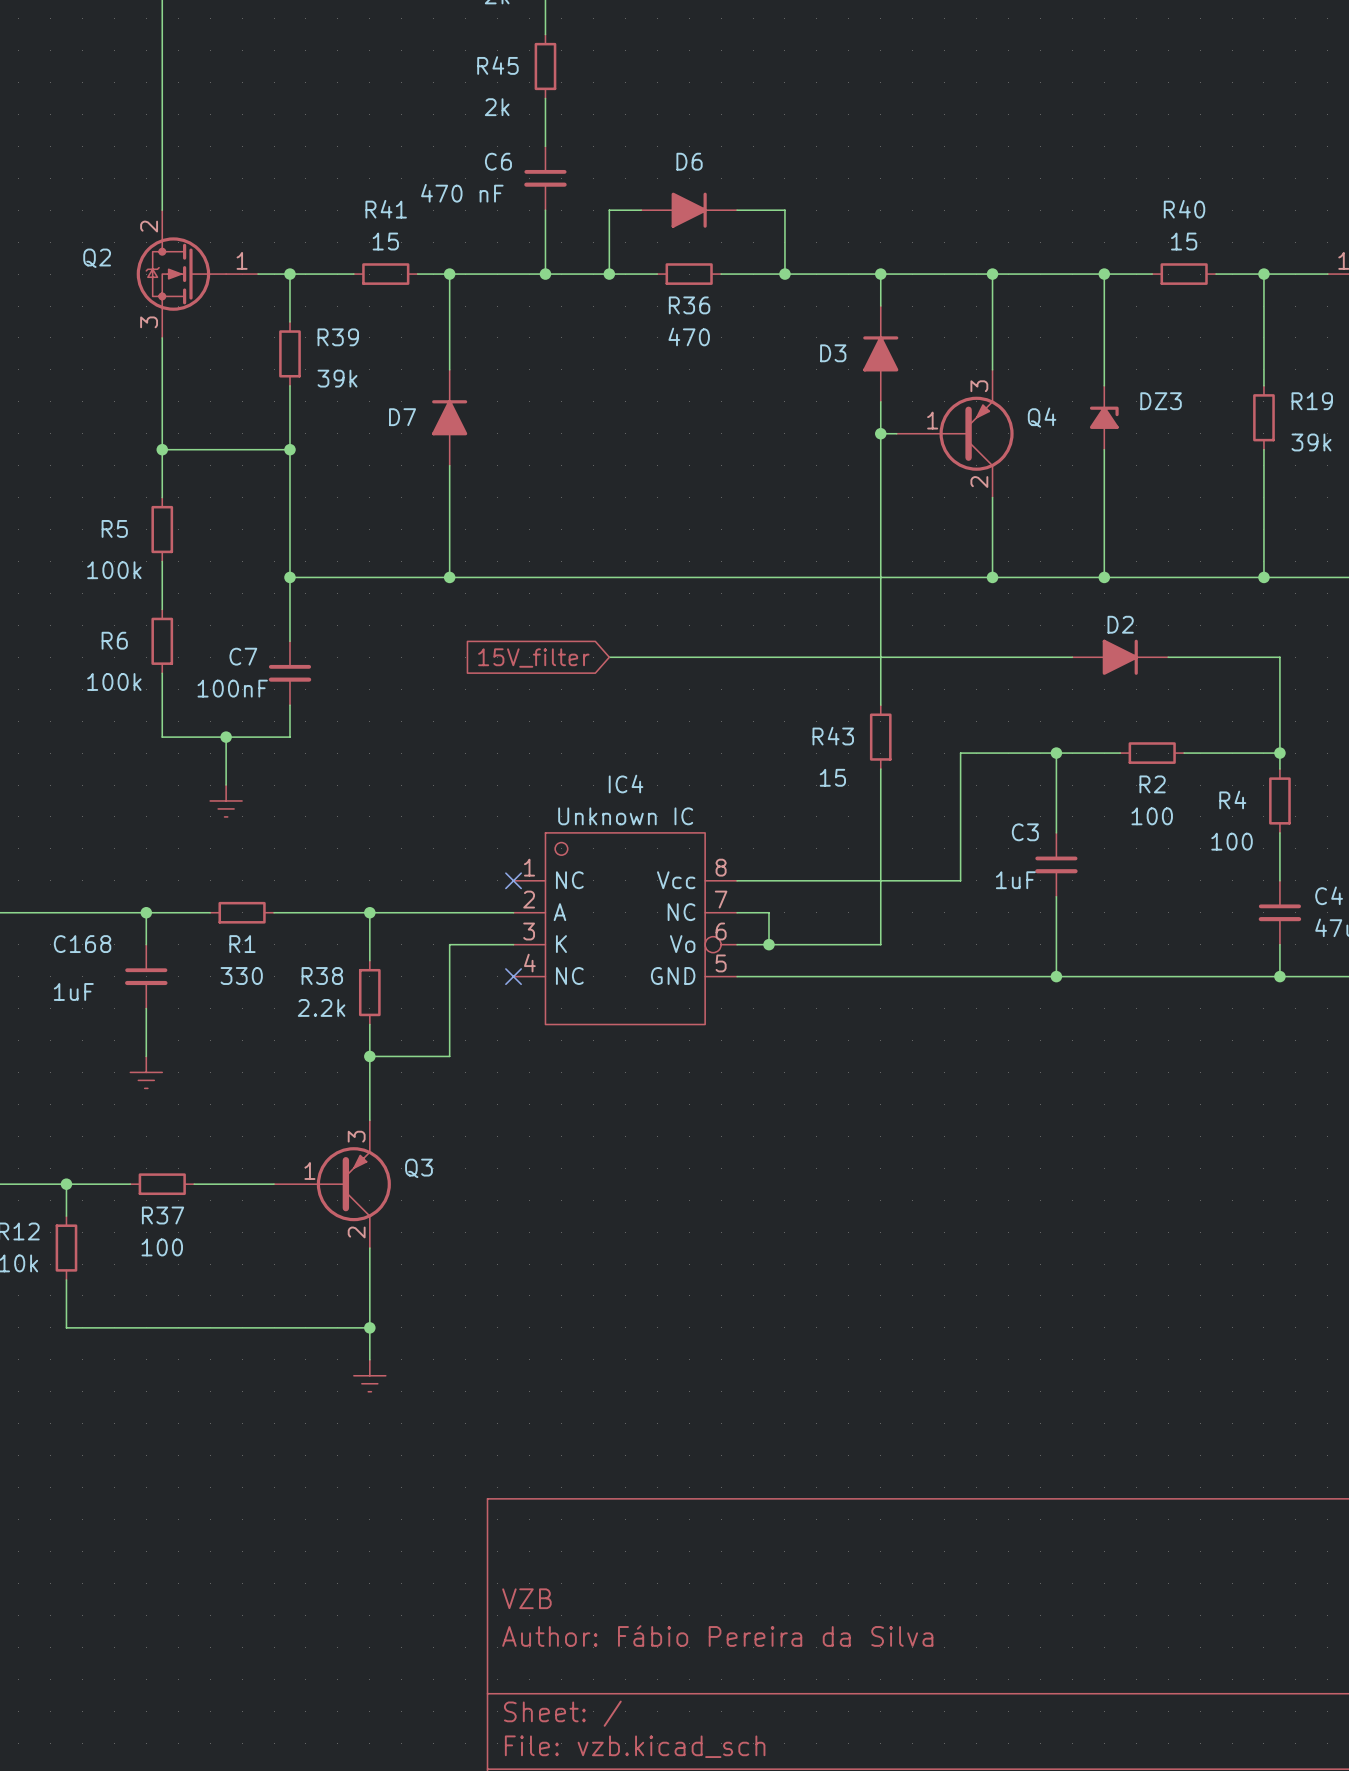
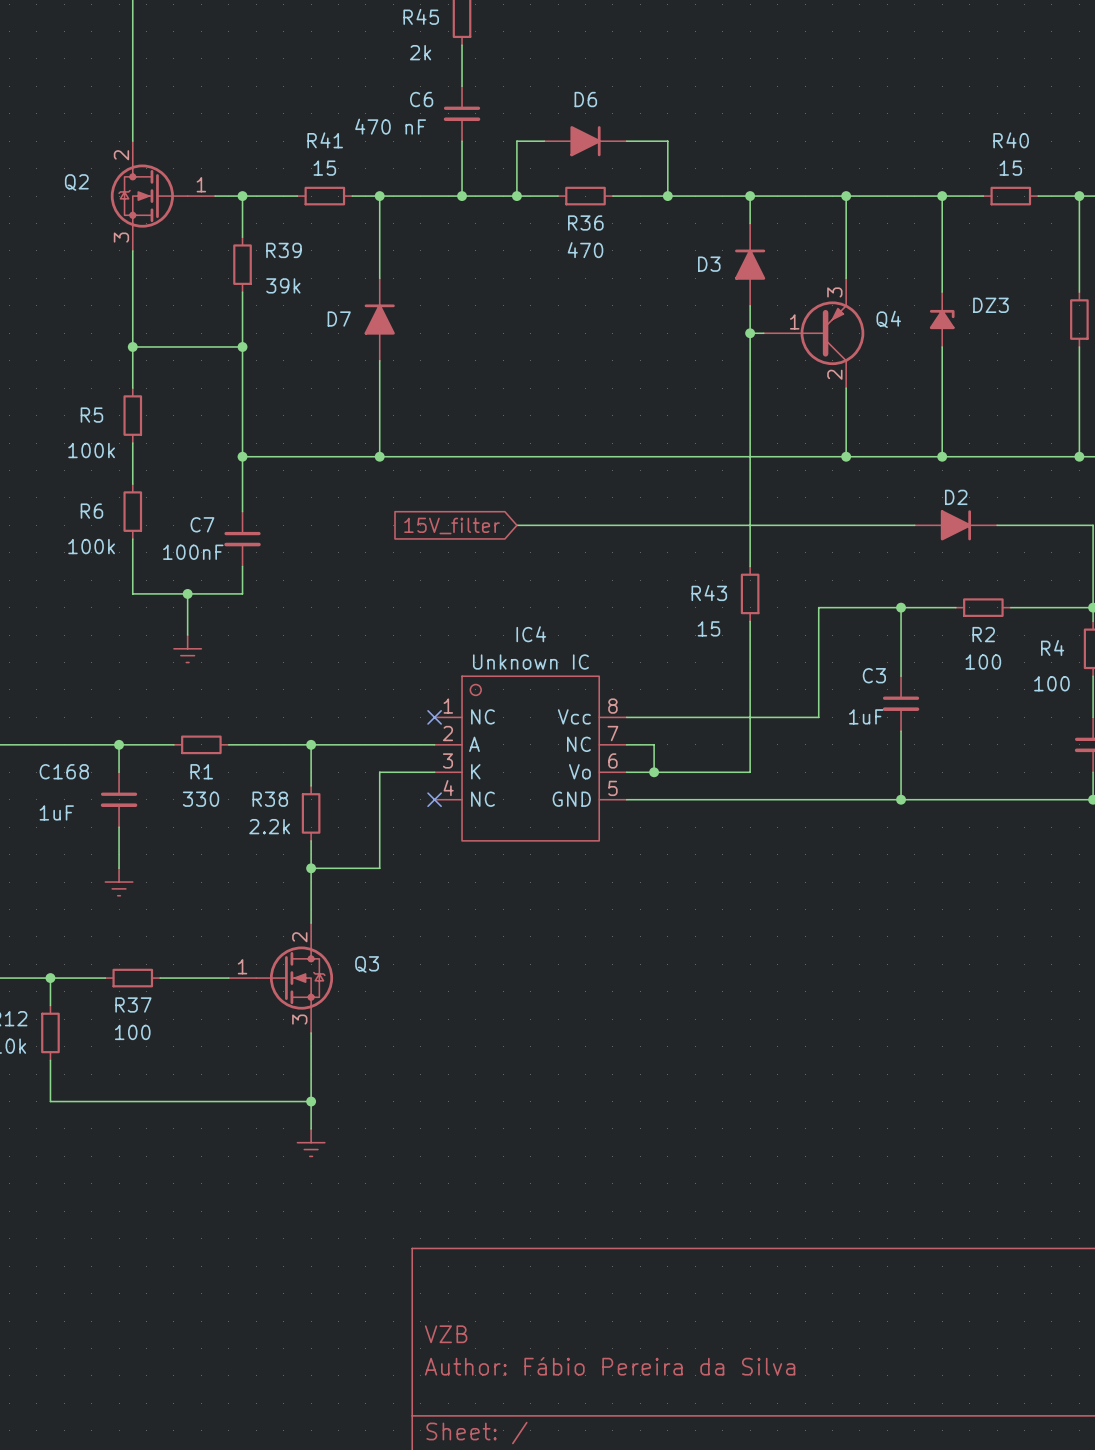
IC4 symbol: [513, 832, 738, 1025] -> [434, 676, 627, 841]
Q3 symbol: [274, 1120, 391, 1249] -> [228, 923, 334, 1033]

